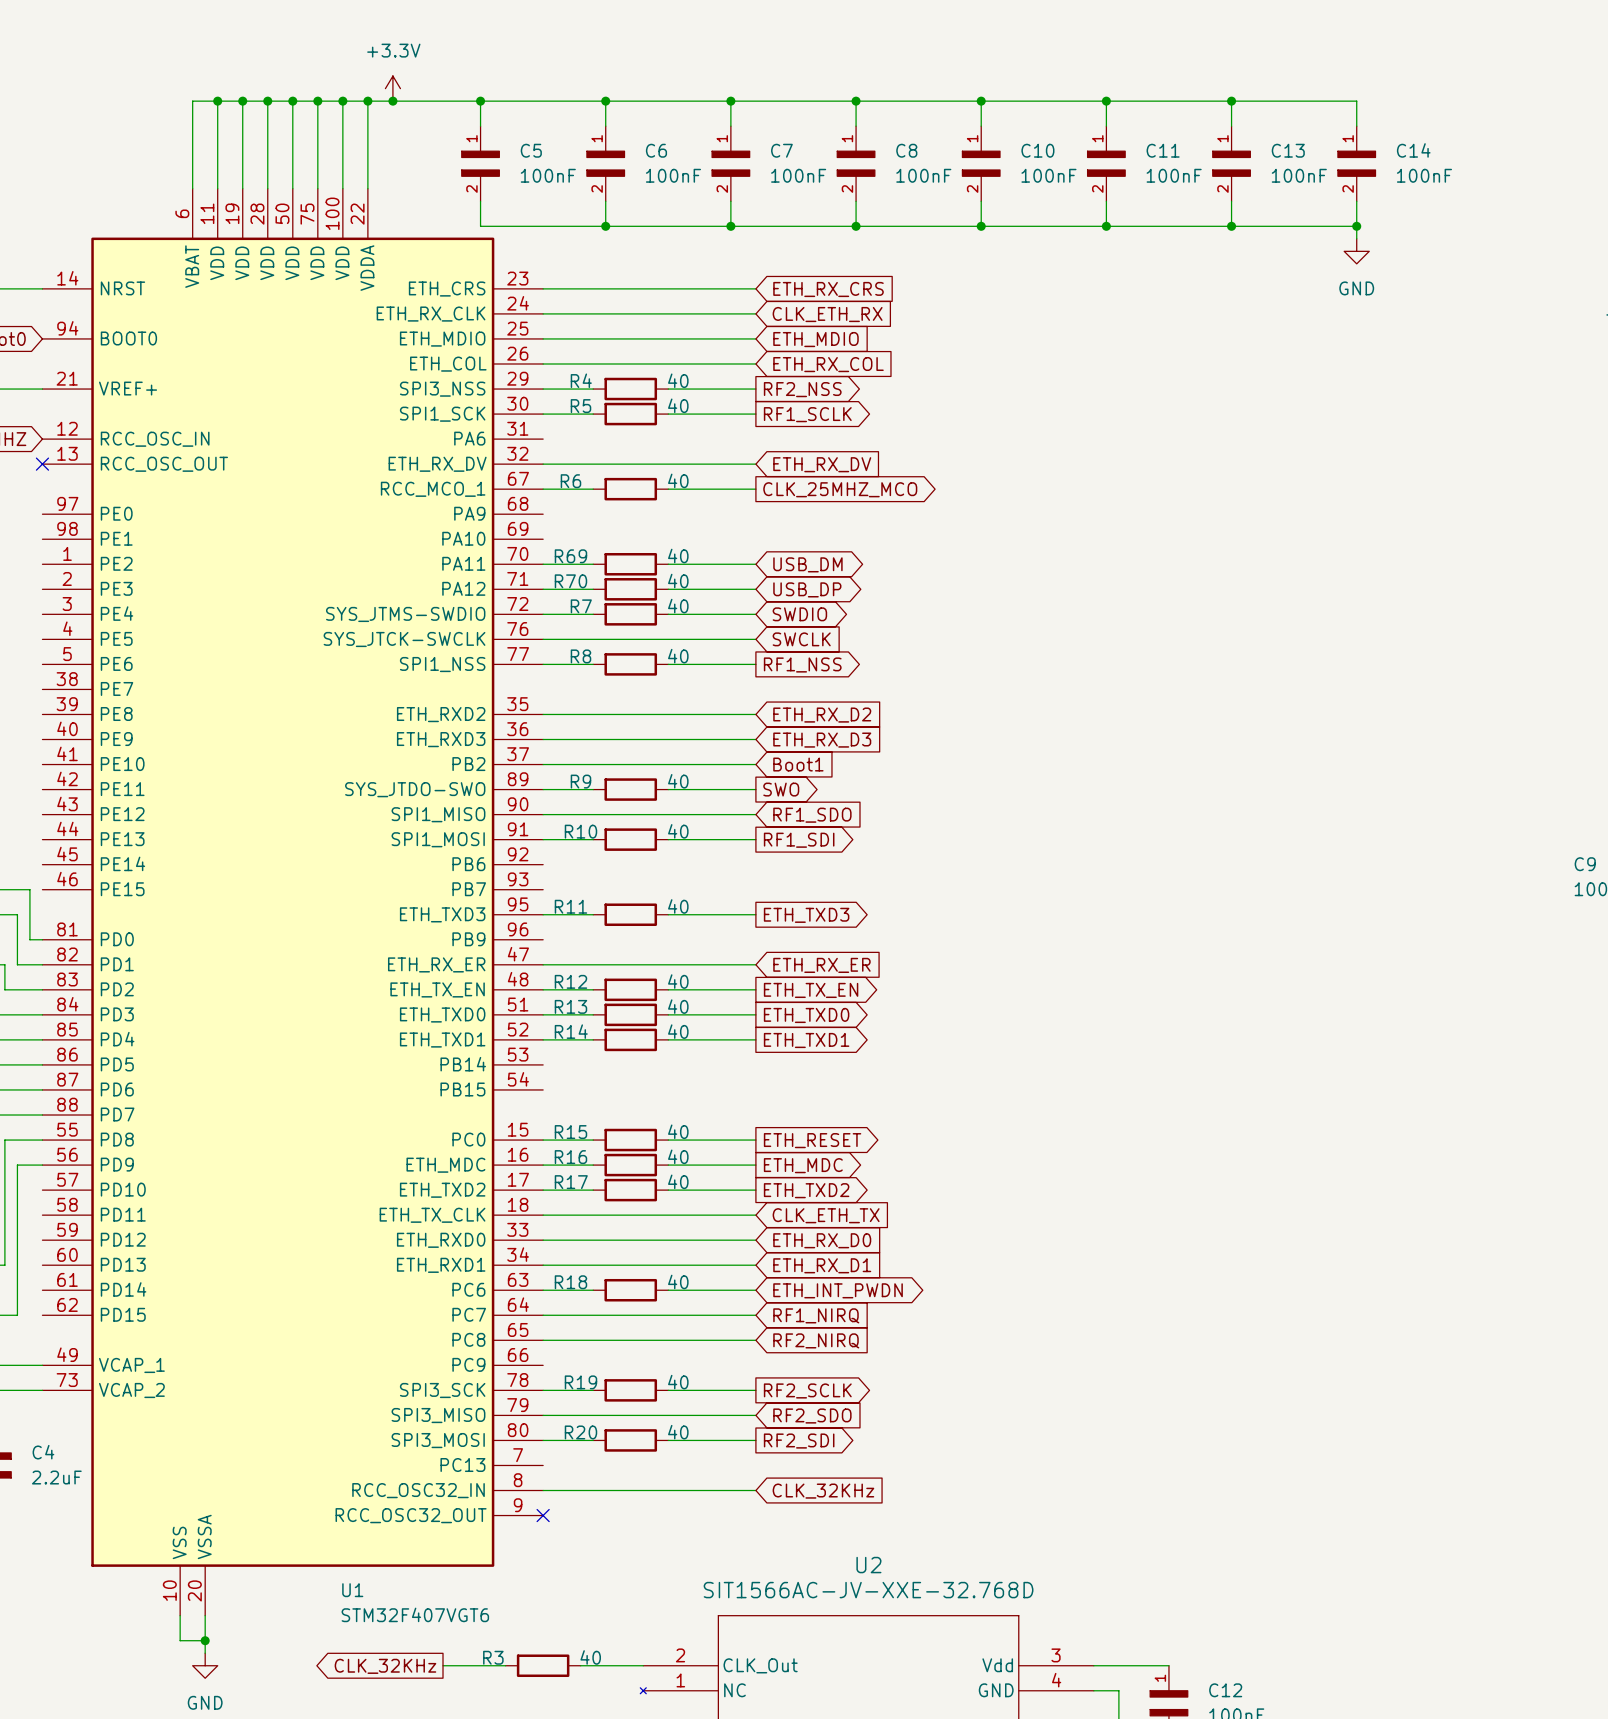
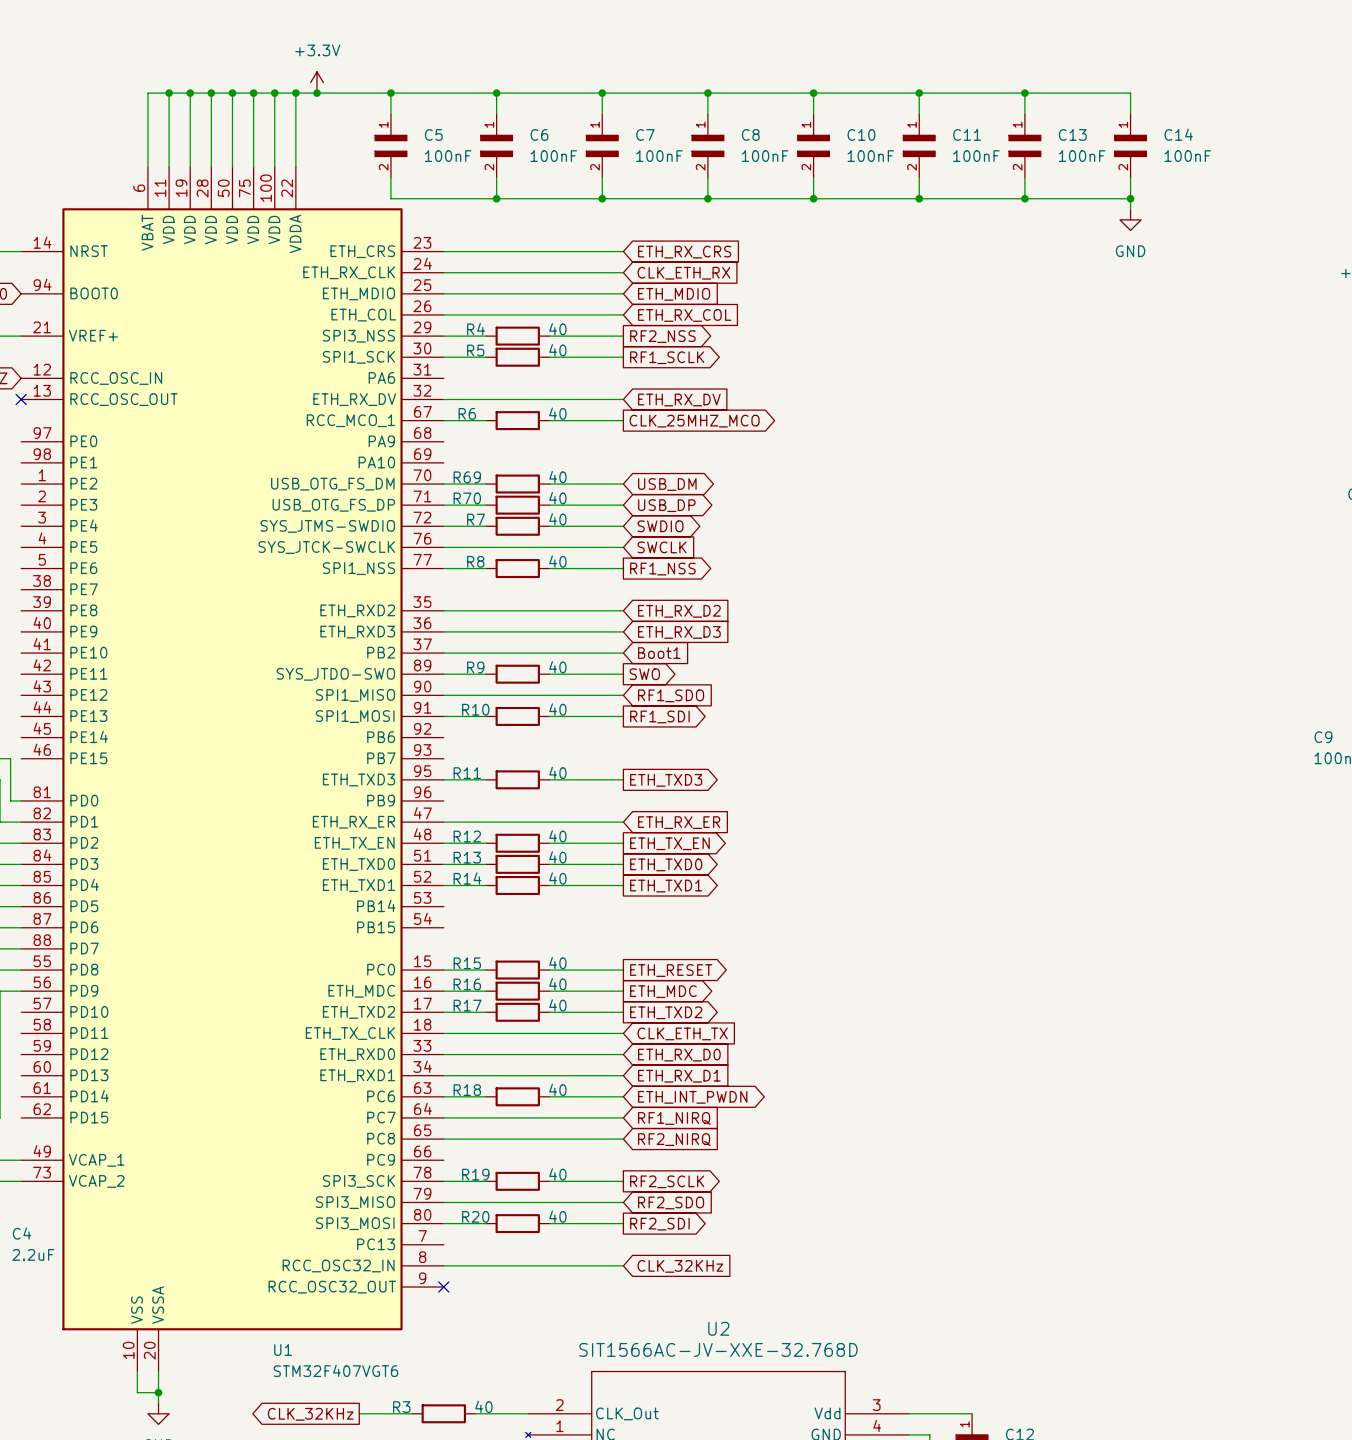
U1 pin name: PA11 (463, 563) -> USB_OTG_FS_DM (332, 484)
U1 pin name: PA12 (463, 588) -> USB_OTG_FS_DP (333, 505)

